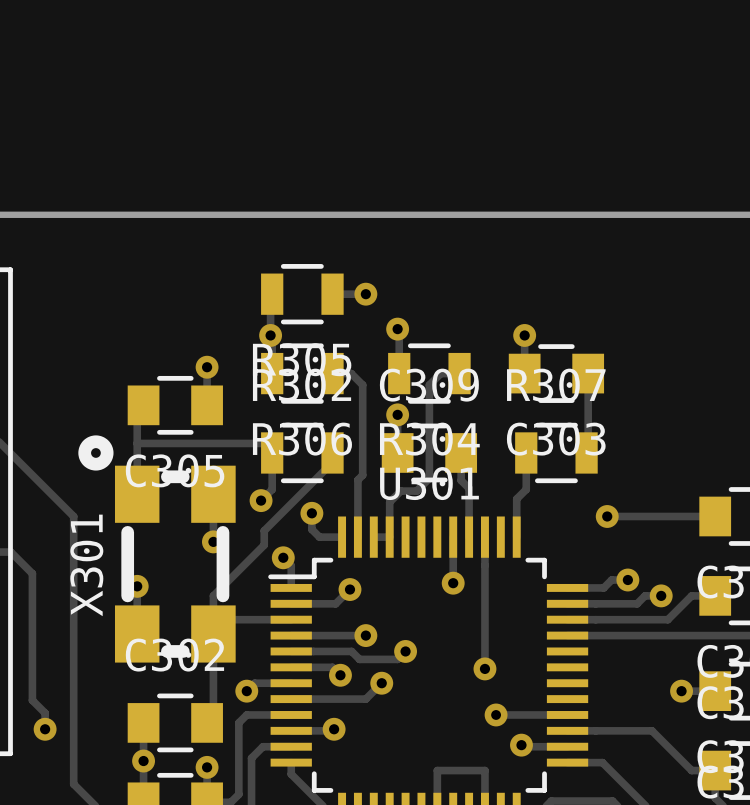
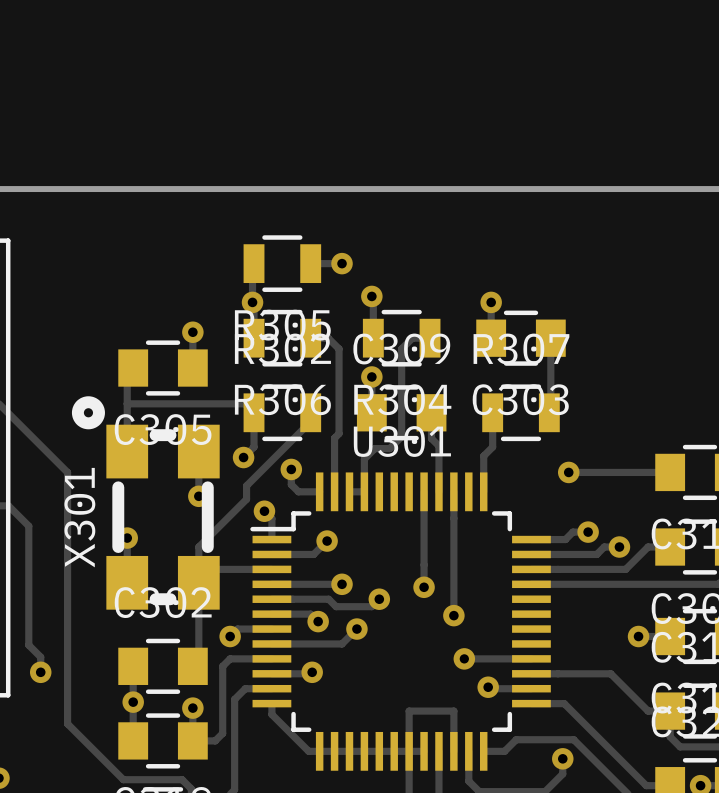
track: none -> (424, 535) (424, 587)
via position: (453, 583) -> (424, 587)

